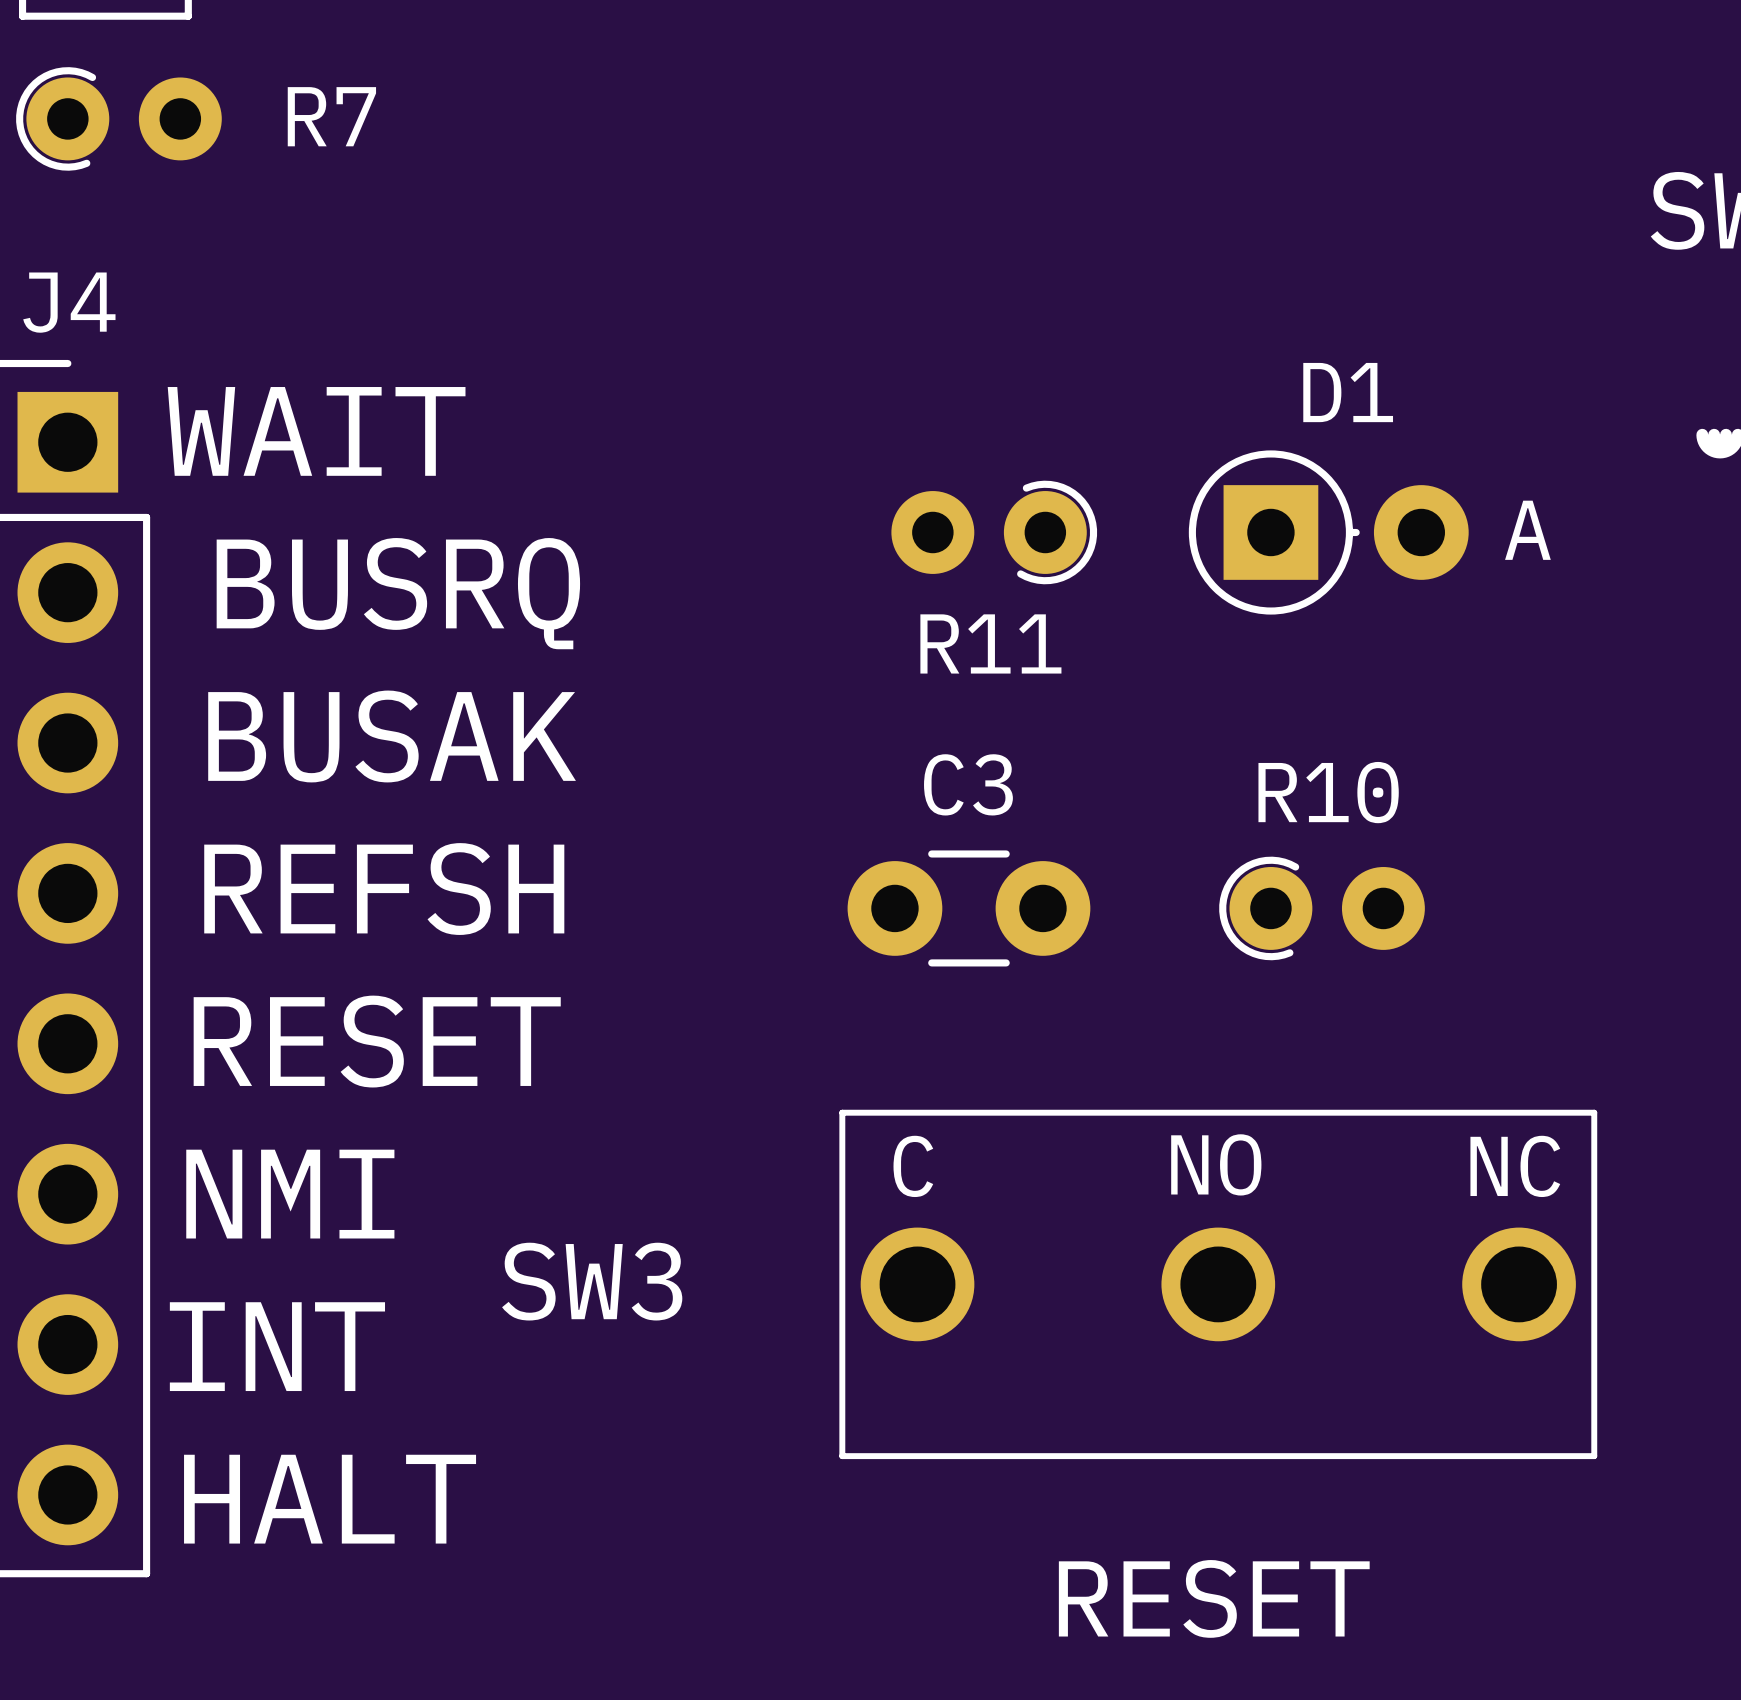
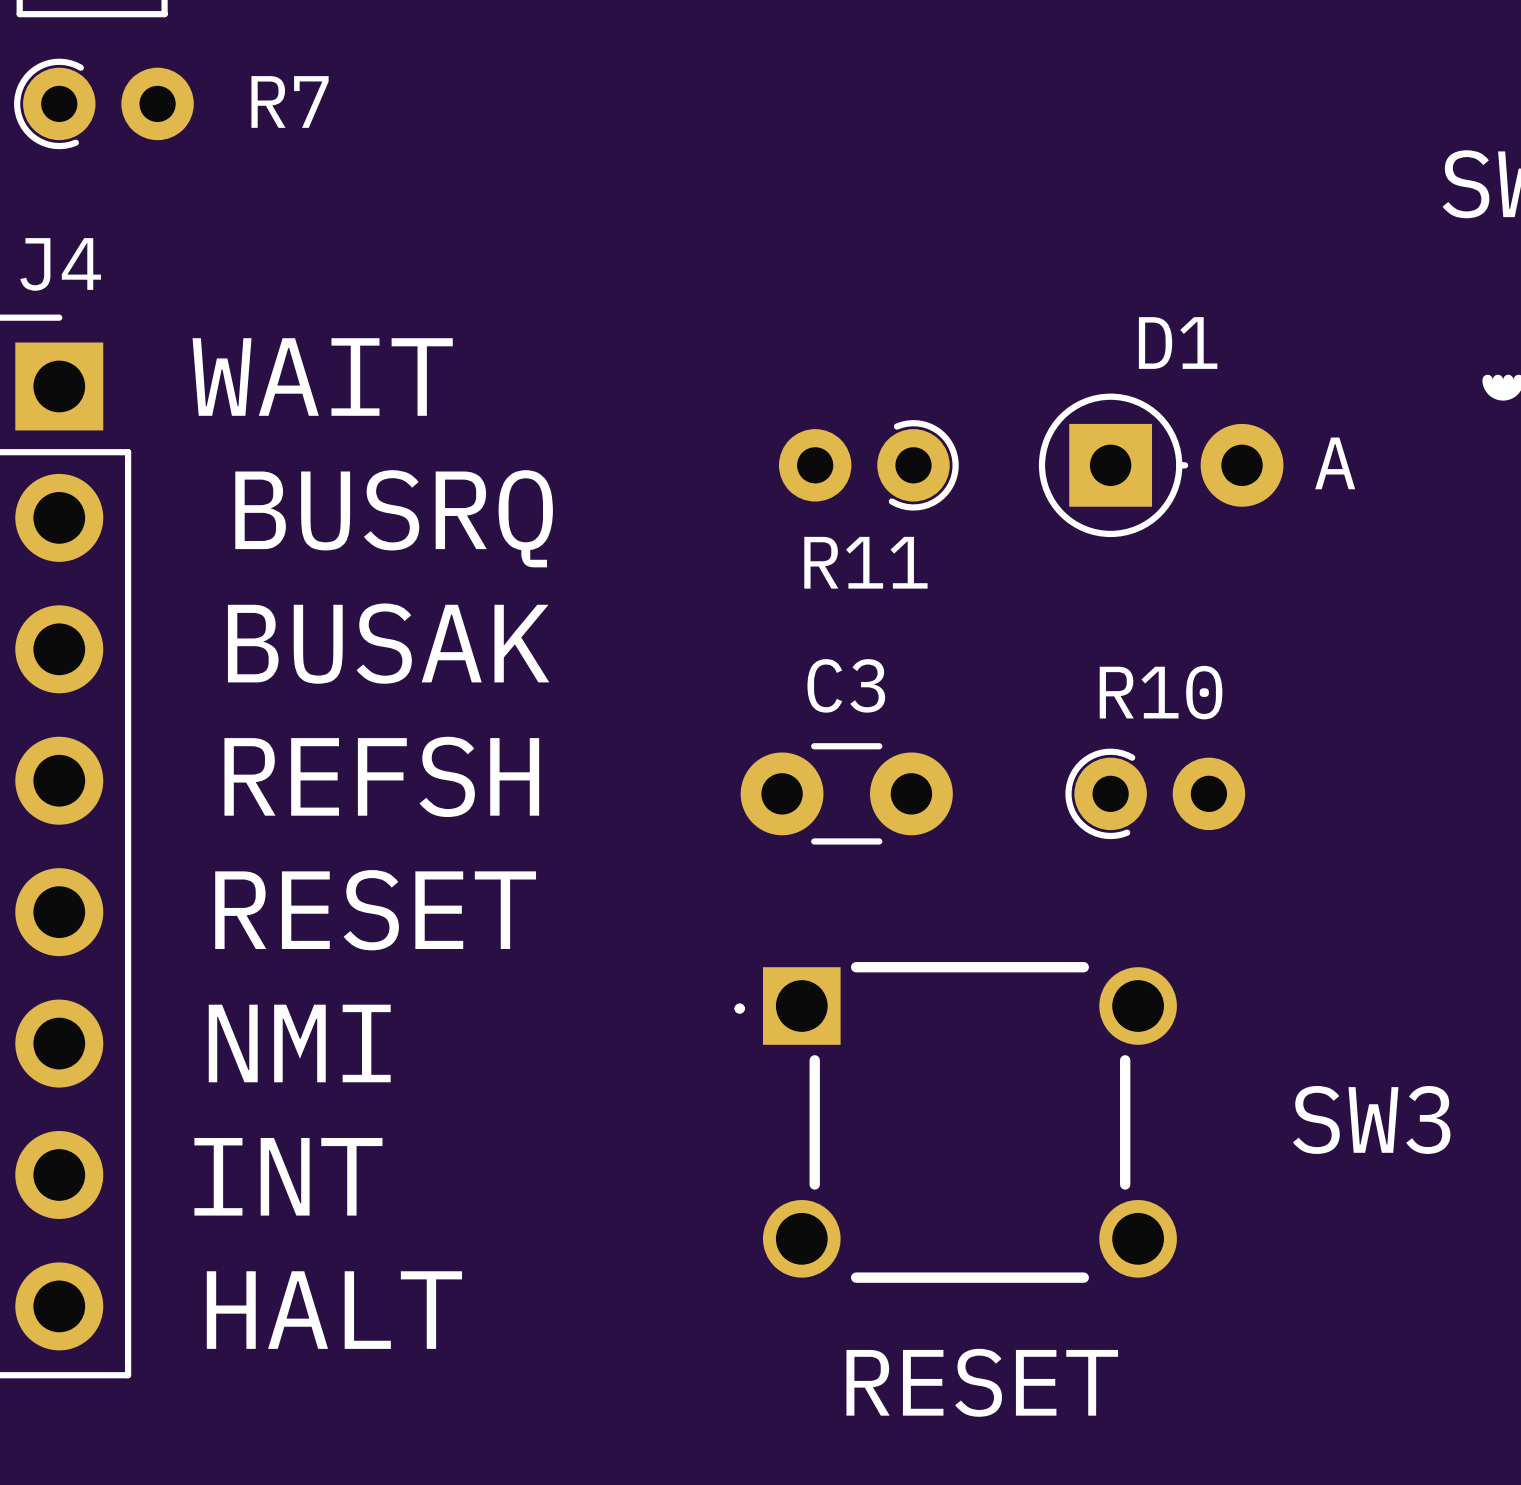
text position: WAIT (316, 431) -> WAIT (322, 377)
text position: BUSRQ (398, 593) -> BUSRQ (394, 518)
text position: BUSAK (392, 736) -> BUSAK (388, 643)
text position: REFSH (384, 889) -> REFSH (381, 776)
text position: RESET (377, 1041) -> RESET (375, 910)
SW3 footprint: [839, 1109, 1598, 1460] -> [734, 962, 1177, 1283]
text position: NMI (290, 1194) -> NMI (299, 1043)
SW3 name position: SW3 (592, 1281) -> SW3 (1371, 1119)
text position: INT (277, 1346) -> INT (288, 1176)
text position: HALT (330, 1499) -> HALT (334, 1310)

